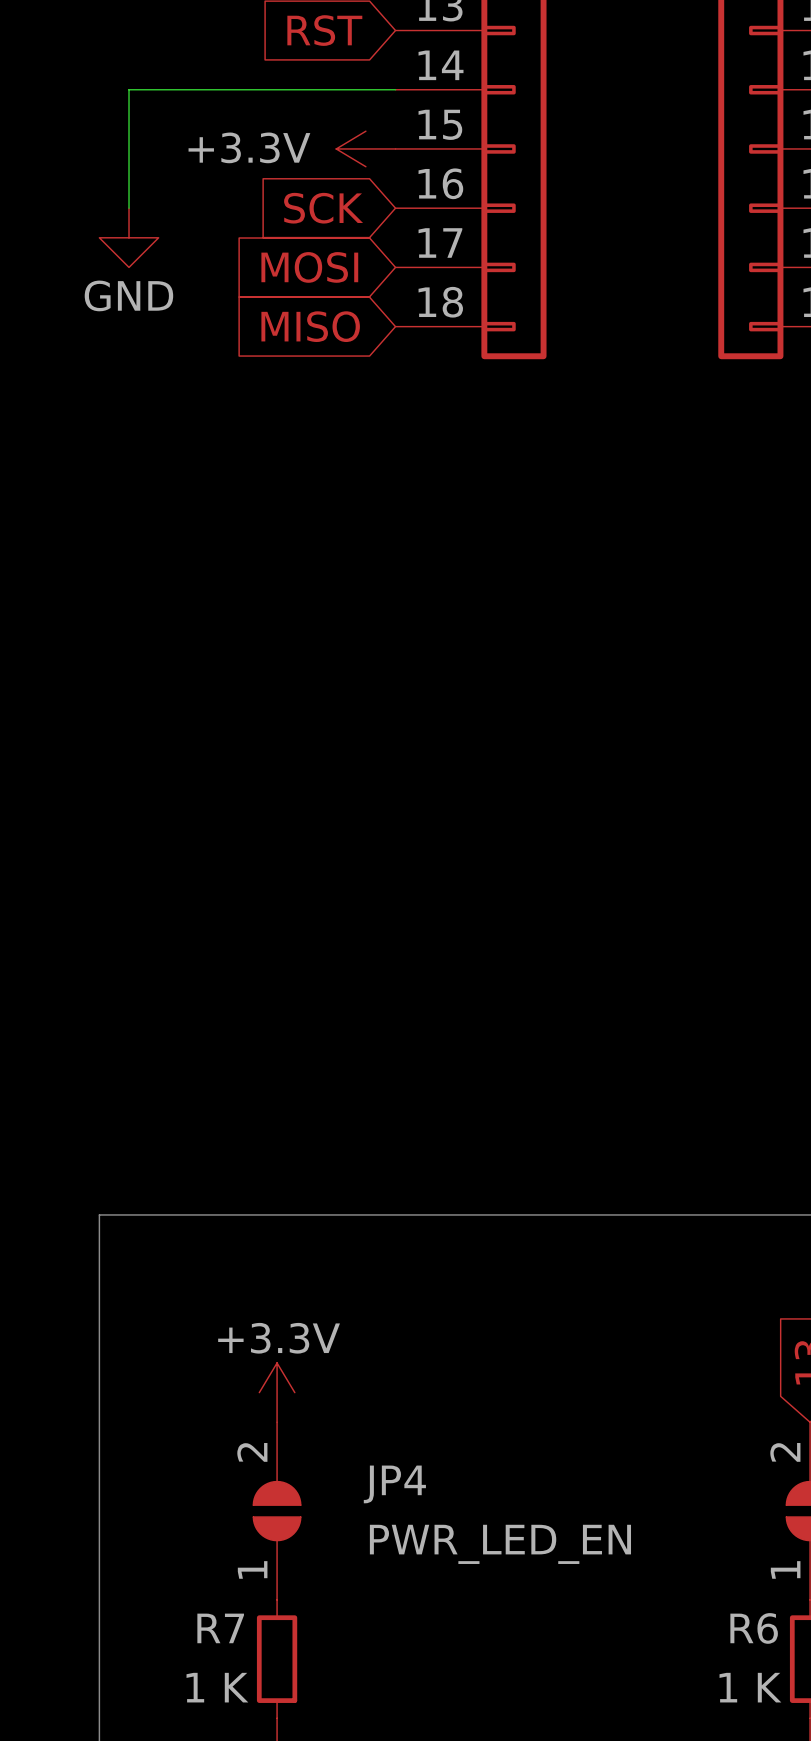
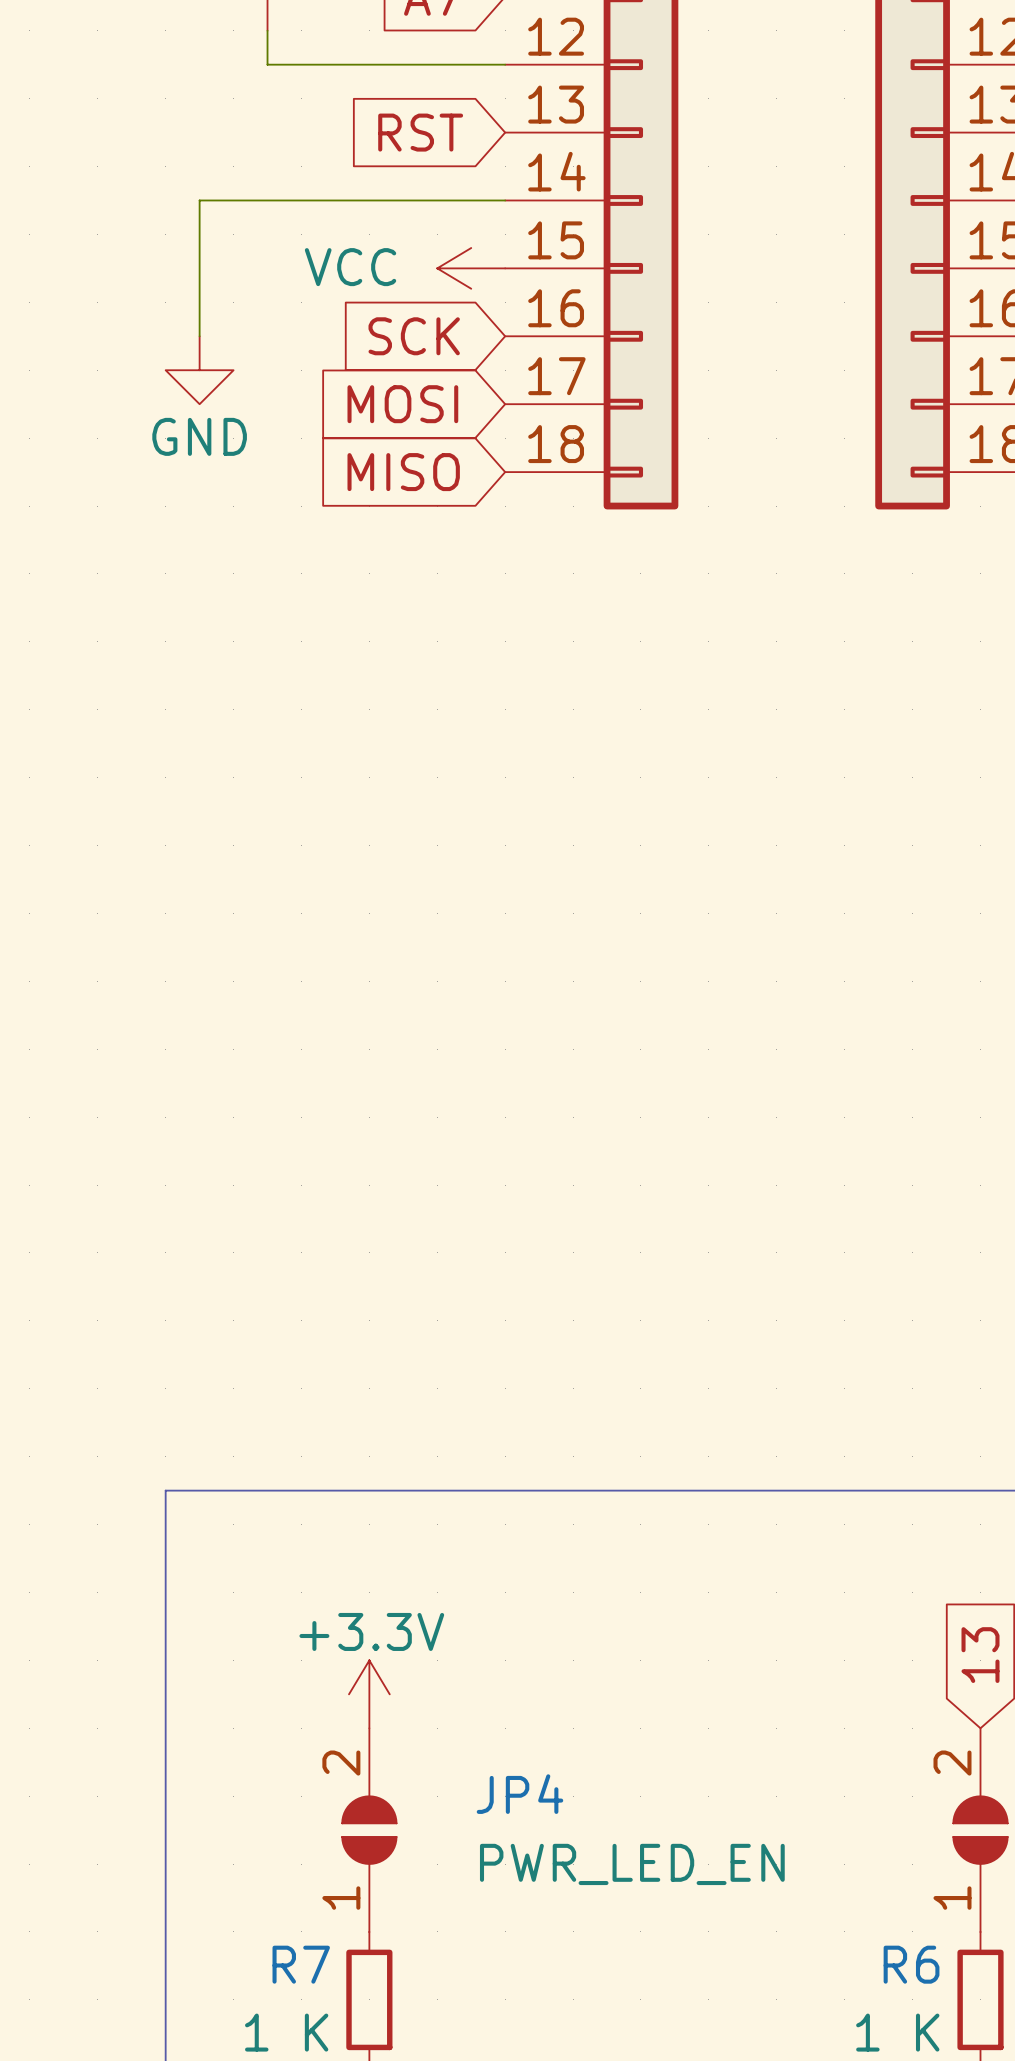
power symbol: +3.3V (365, 148) -> VCC (471, 268)

